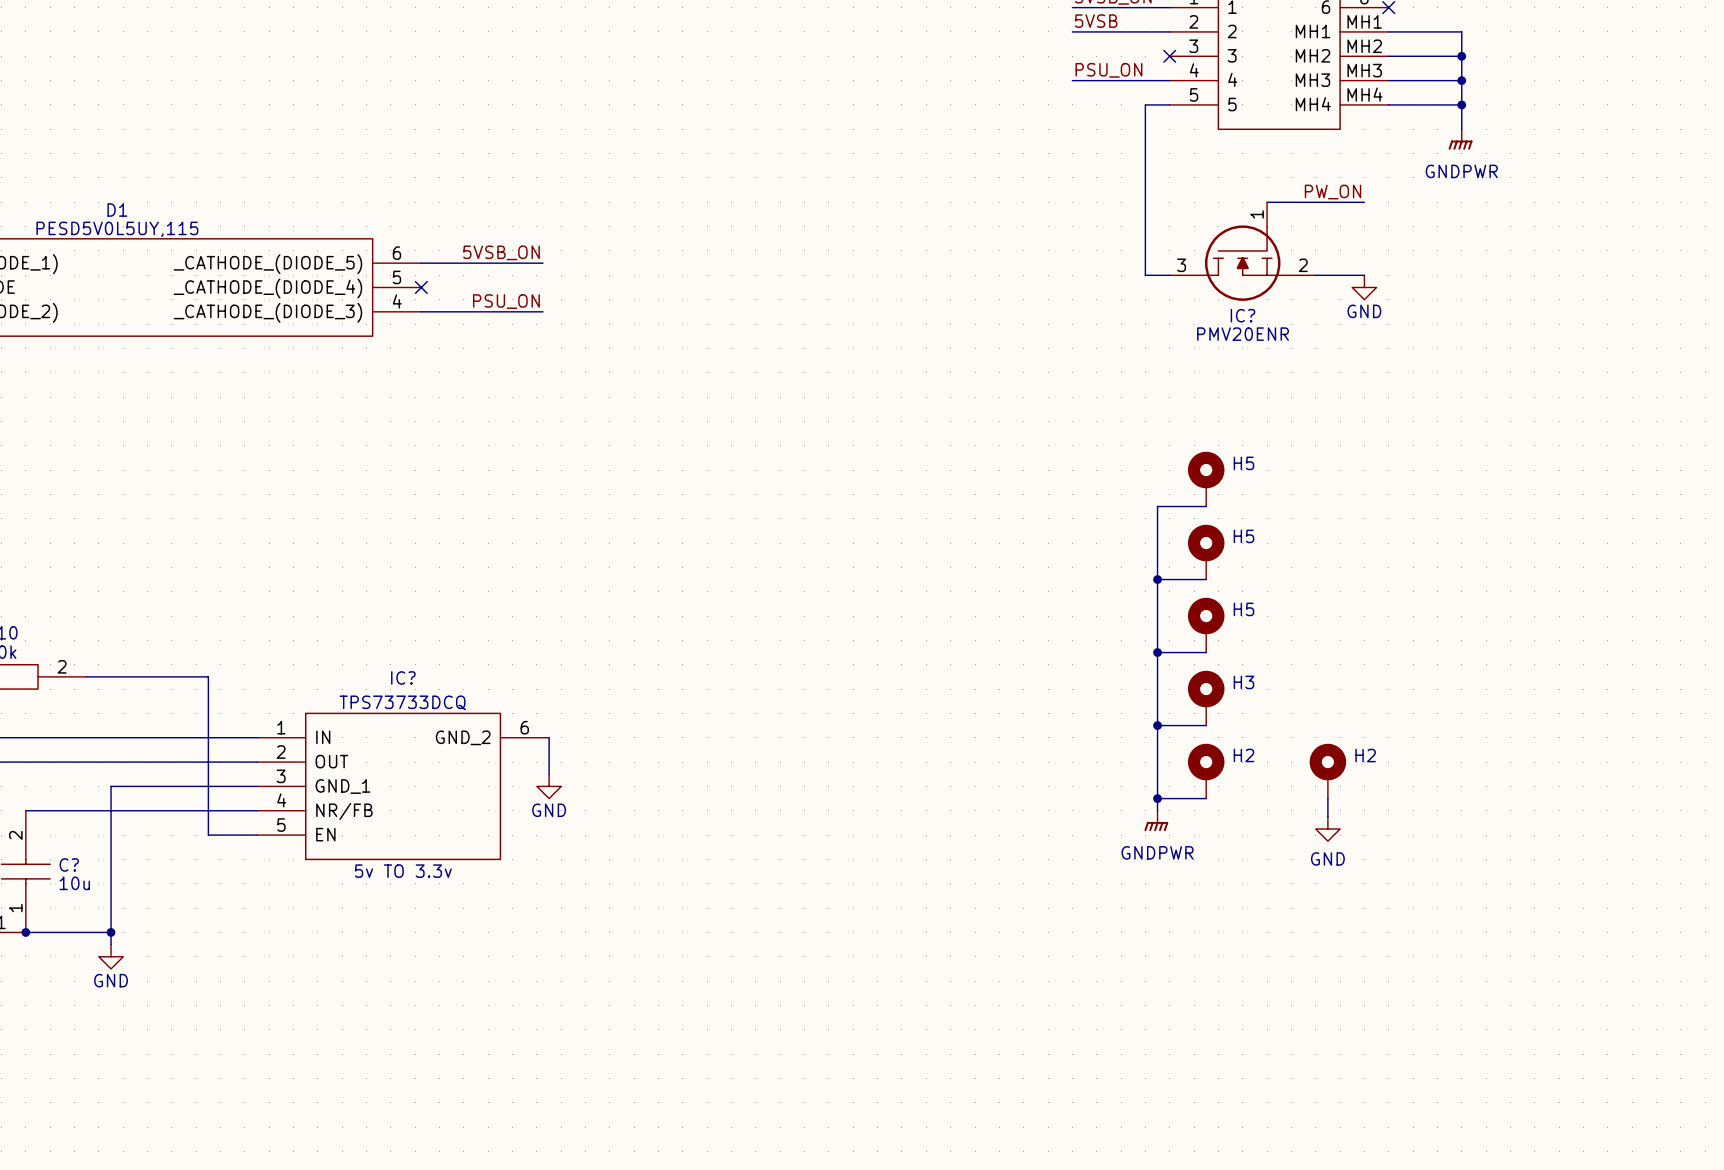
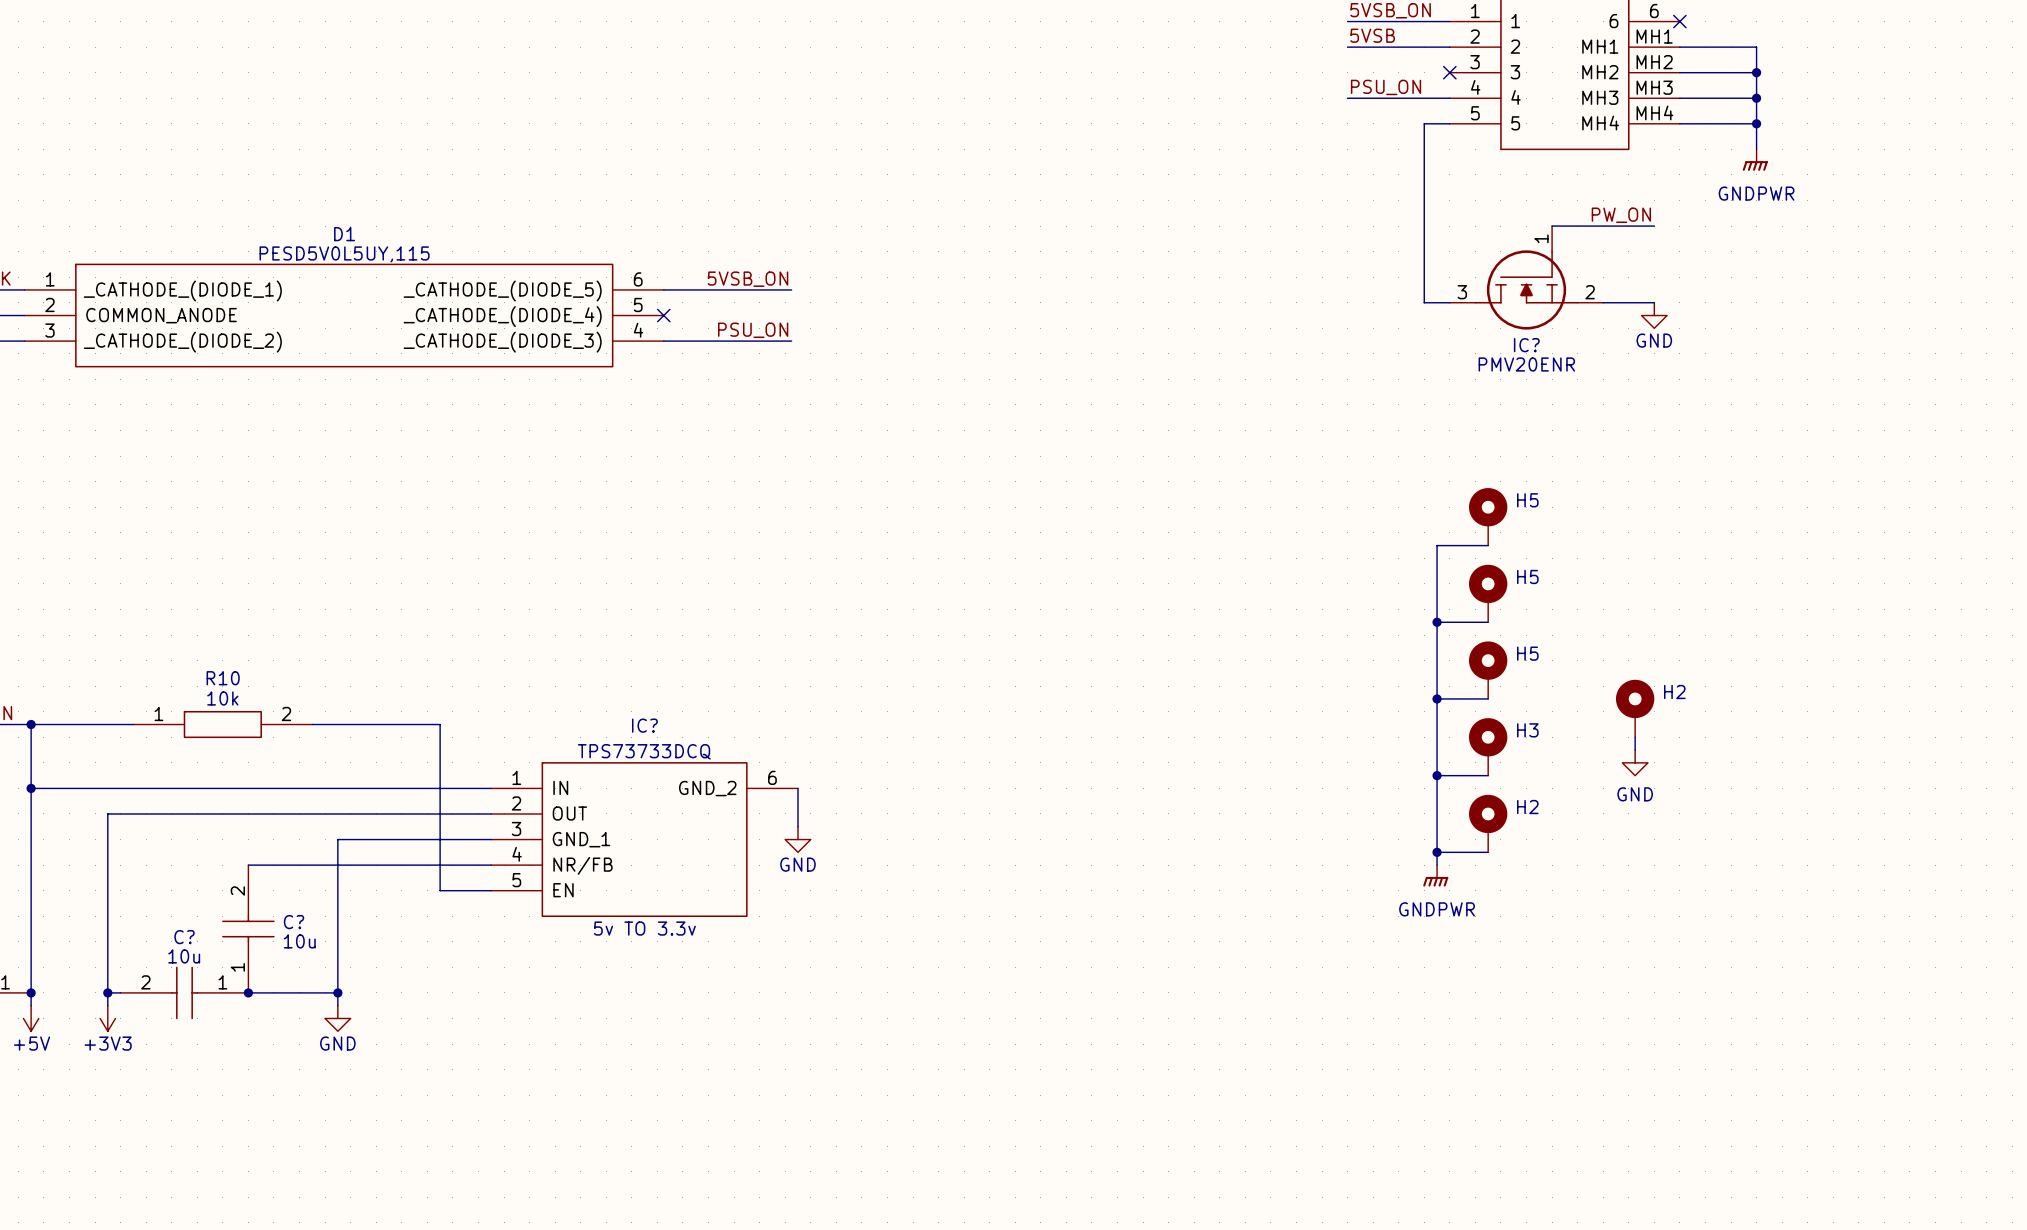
wire: none -> (1635, 737) (1635, 750)
H2 position: (1327, 771) -> (1635, 708)
wire: (1327, 798) (1327, 816) -> none
power symbol position: GND (1327, 829) -> GND (1635, 762)

